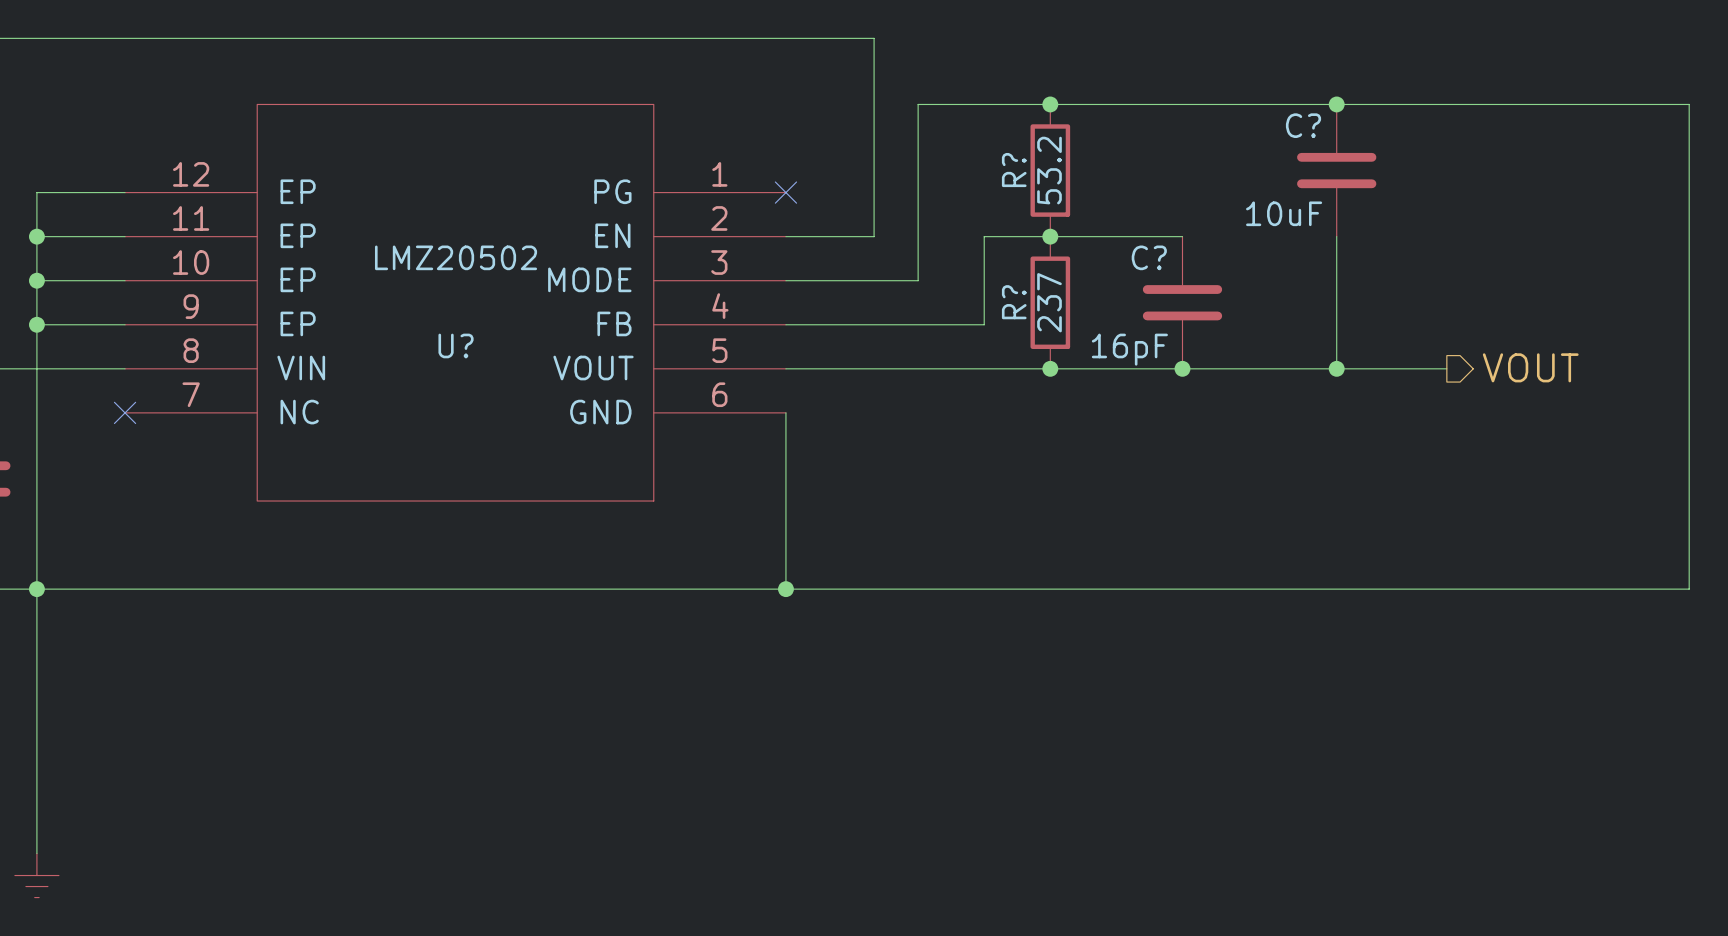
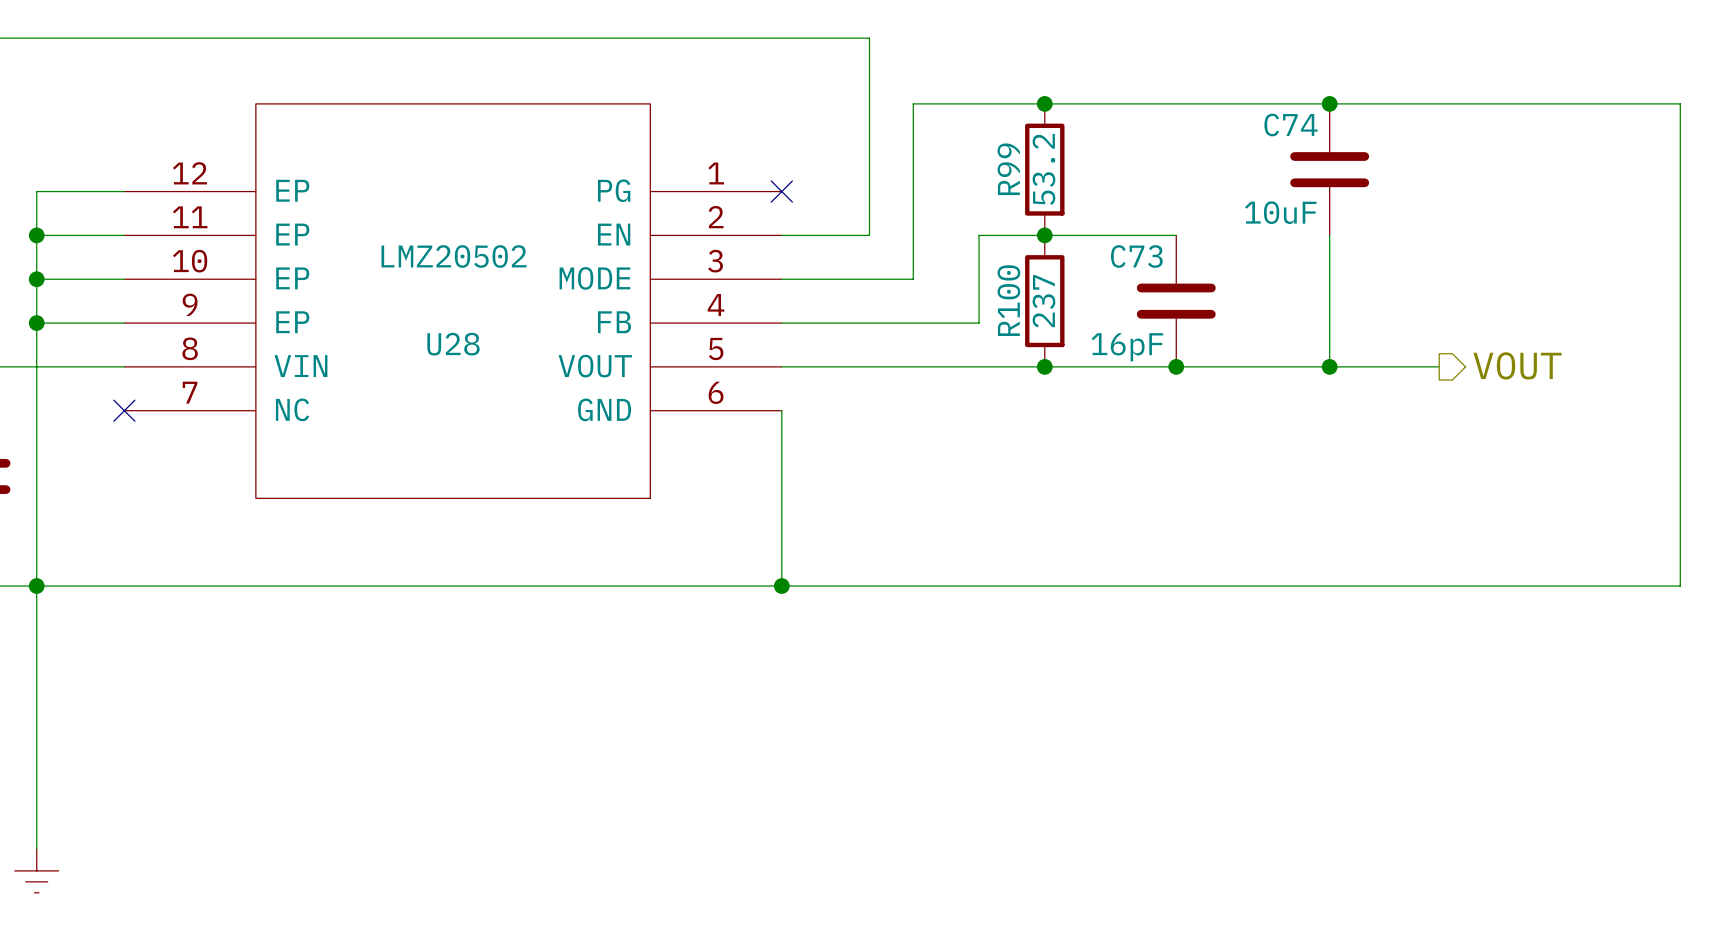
C? name: C? (1303, 125) -> C74 (1290, 125)
R? name: R? (1014, 170) -> R99 (1008, 169)
C? name: C? (1149, 257) -> C73 (1136, 256)
R? name: R? (1014, 302) -> R100 (1008, 300)
U? name: U? (456, 345) -> U28 (453, 344)

